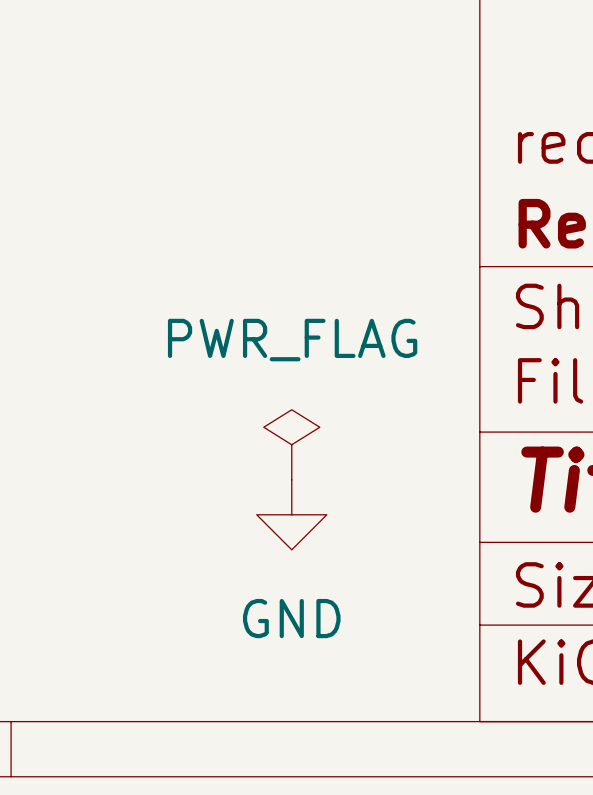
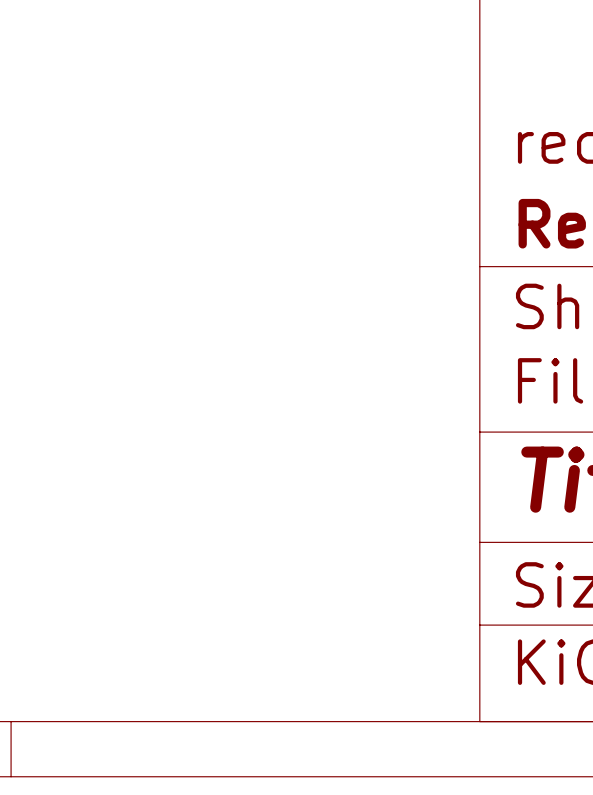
power symbol: PWR_FLAG (291, 444) -> none
power symbol: GND (291, 514) -> none

